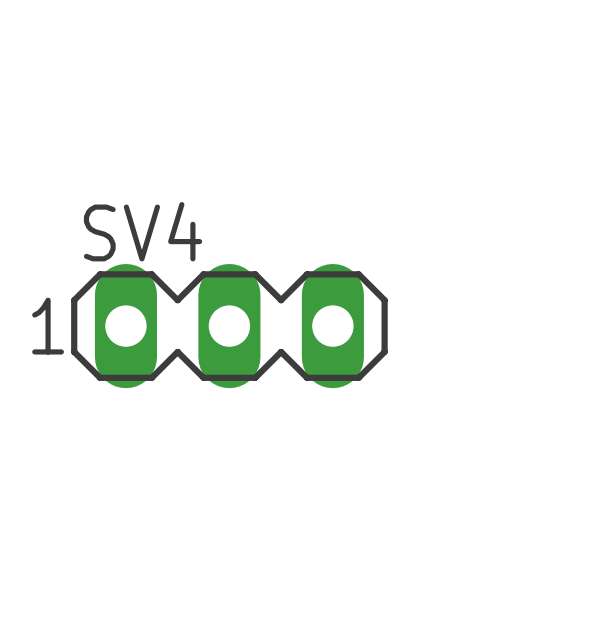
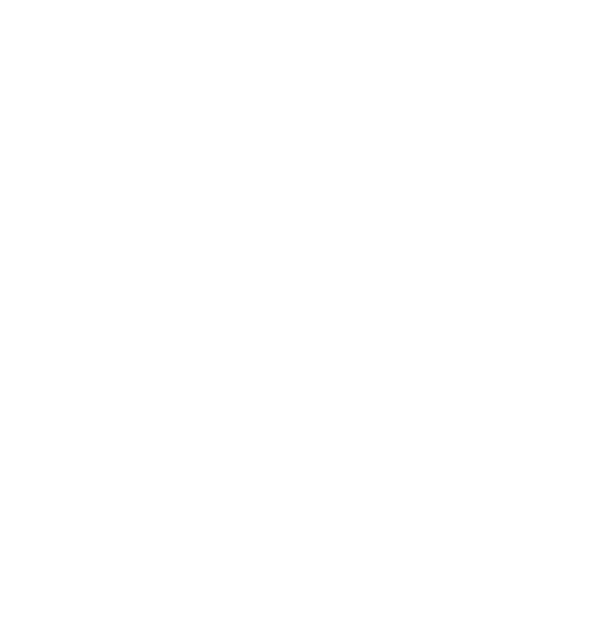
SV4: (229, 326) -> none

